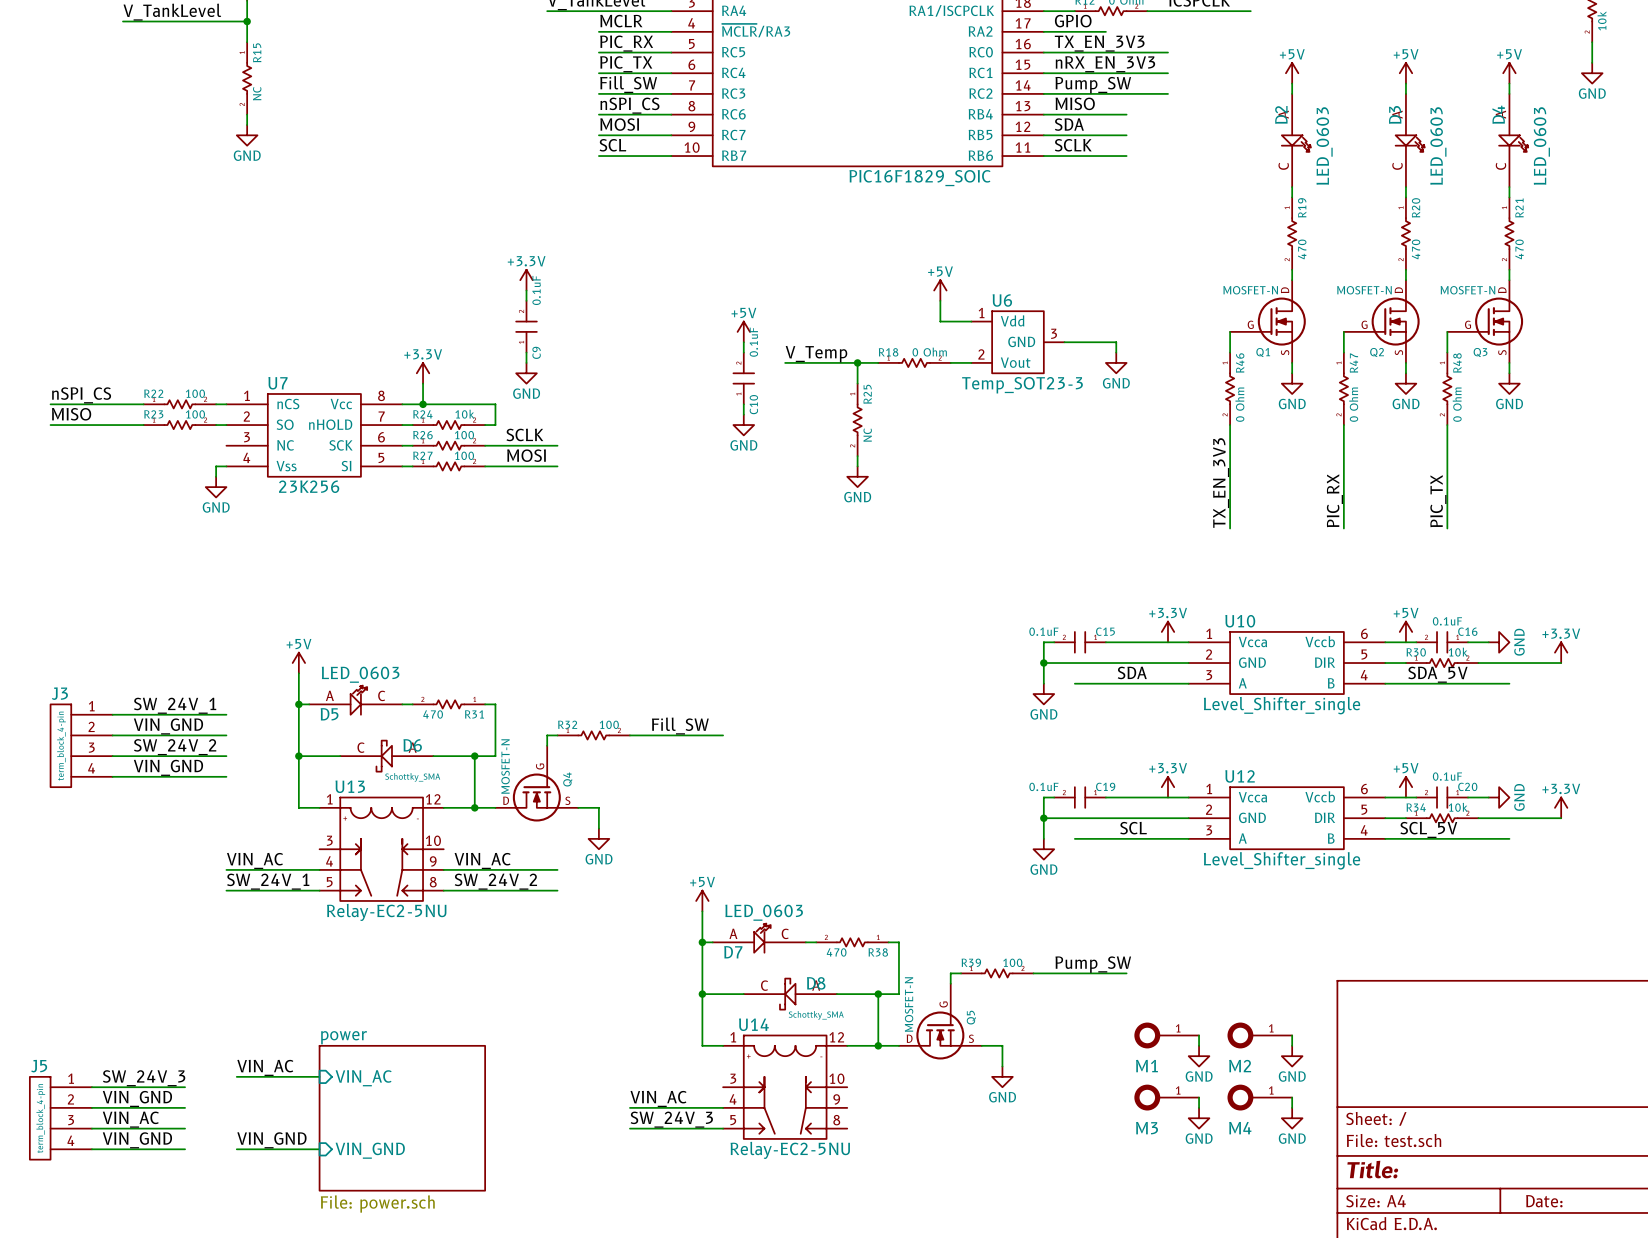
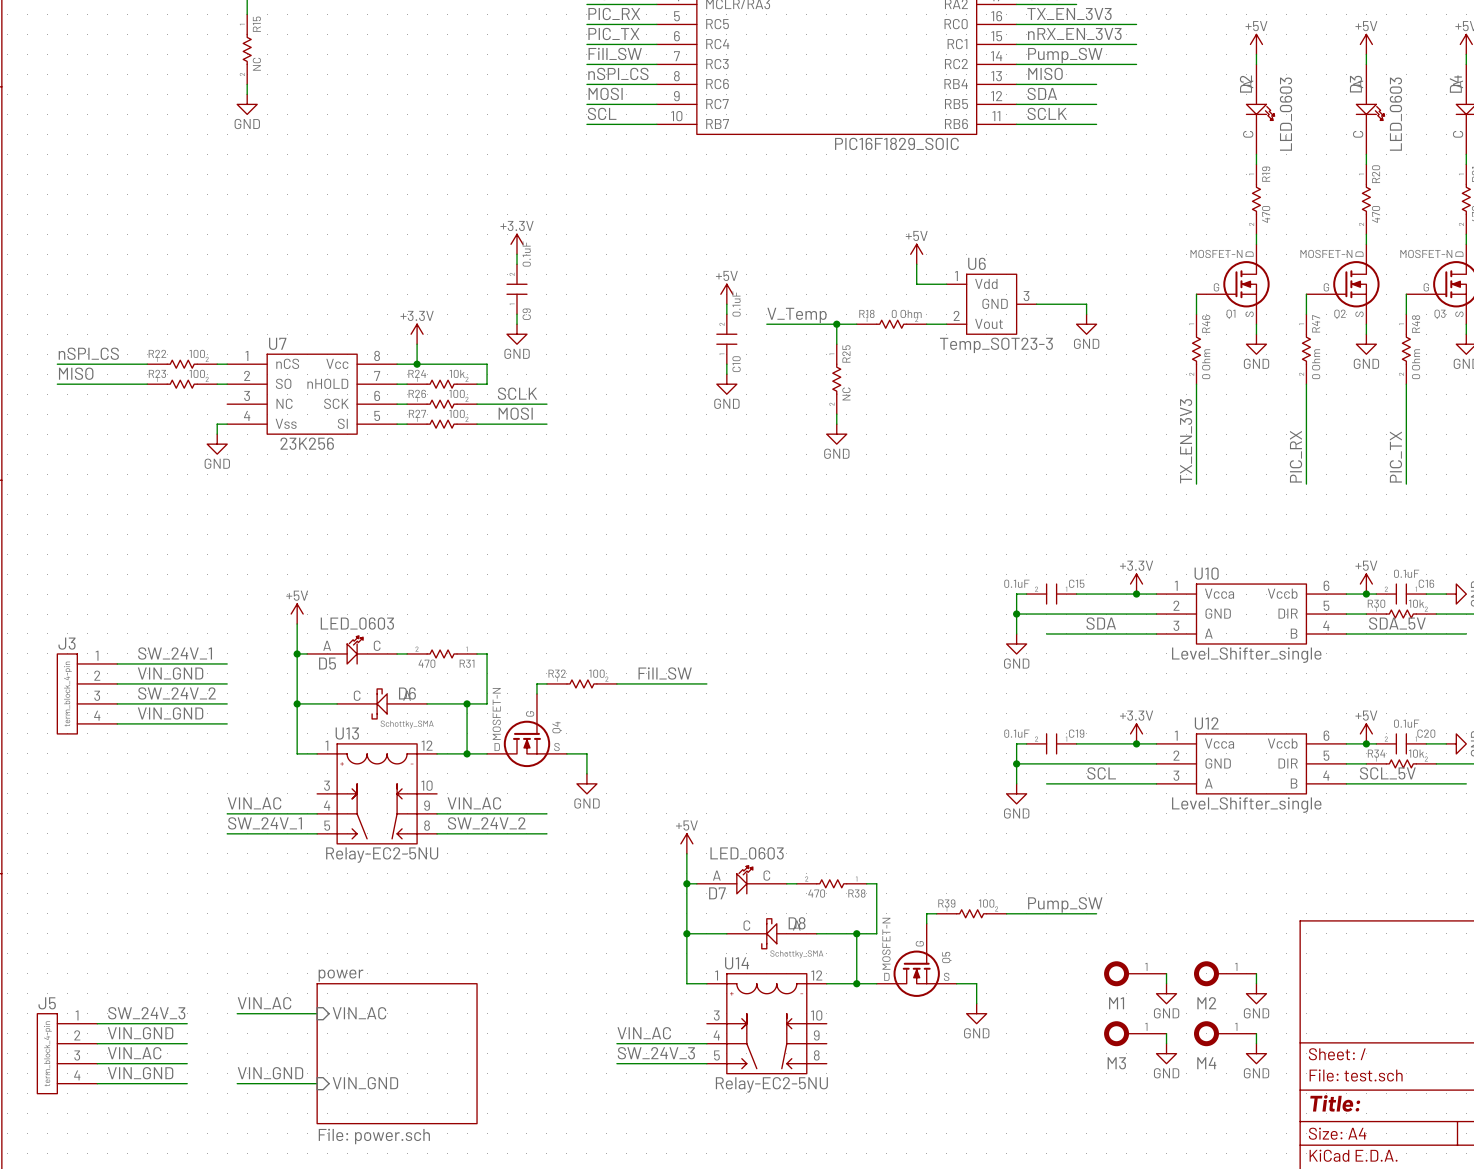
junction: none -> (1136, 594)
junction: none -> (1366, 594)
junction: none -> (1136, 743)
junction: none -> (1366, 743)

